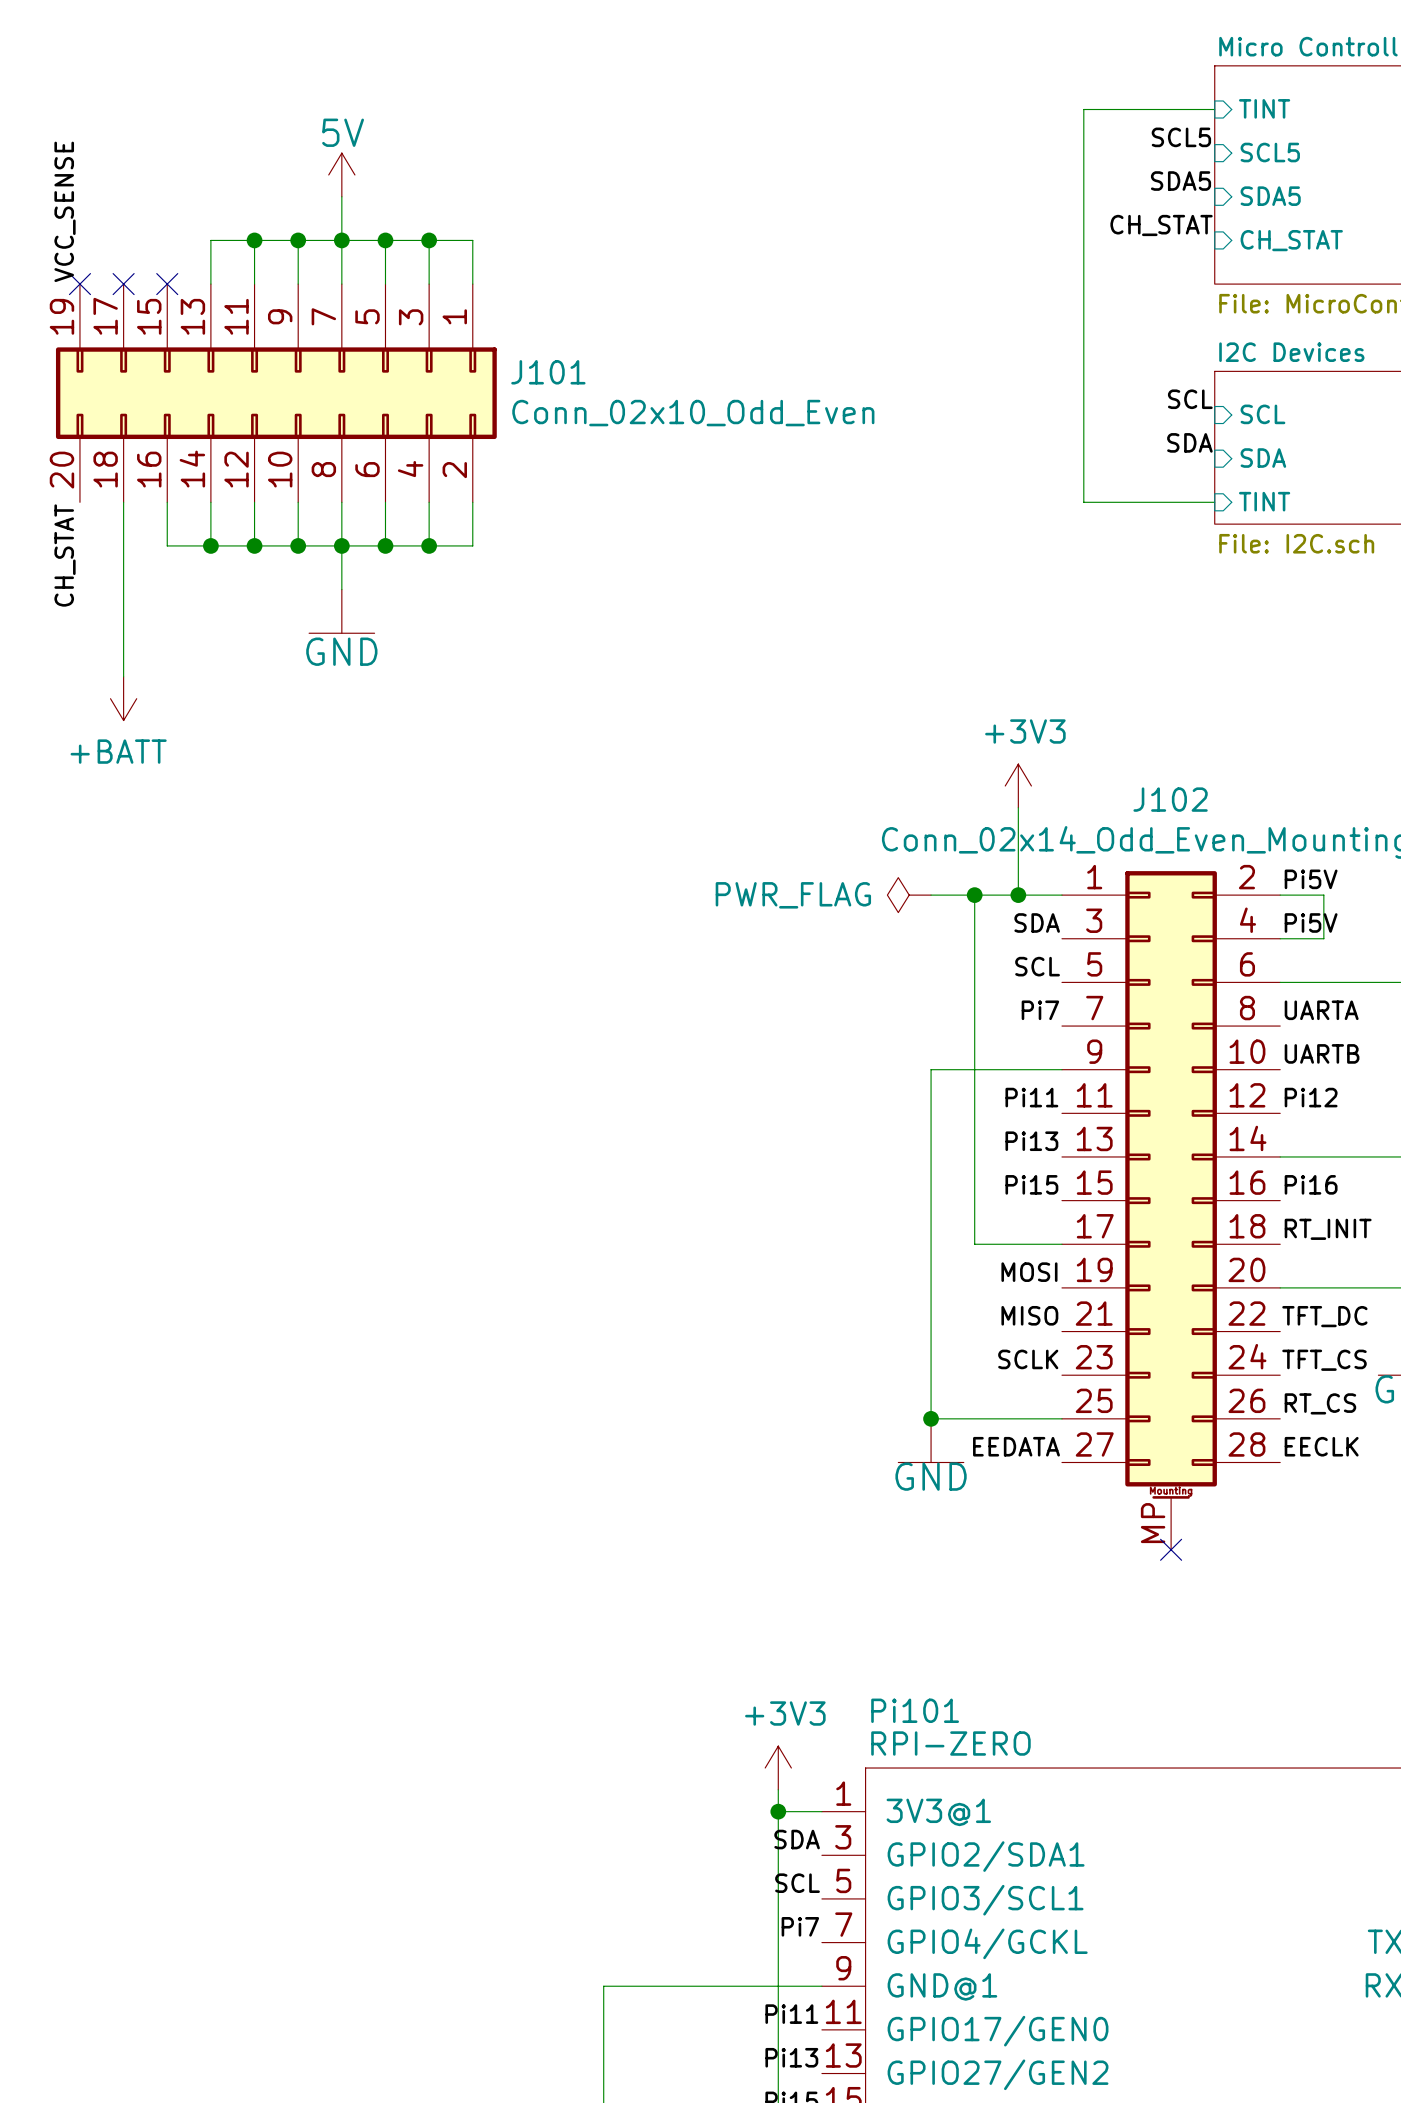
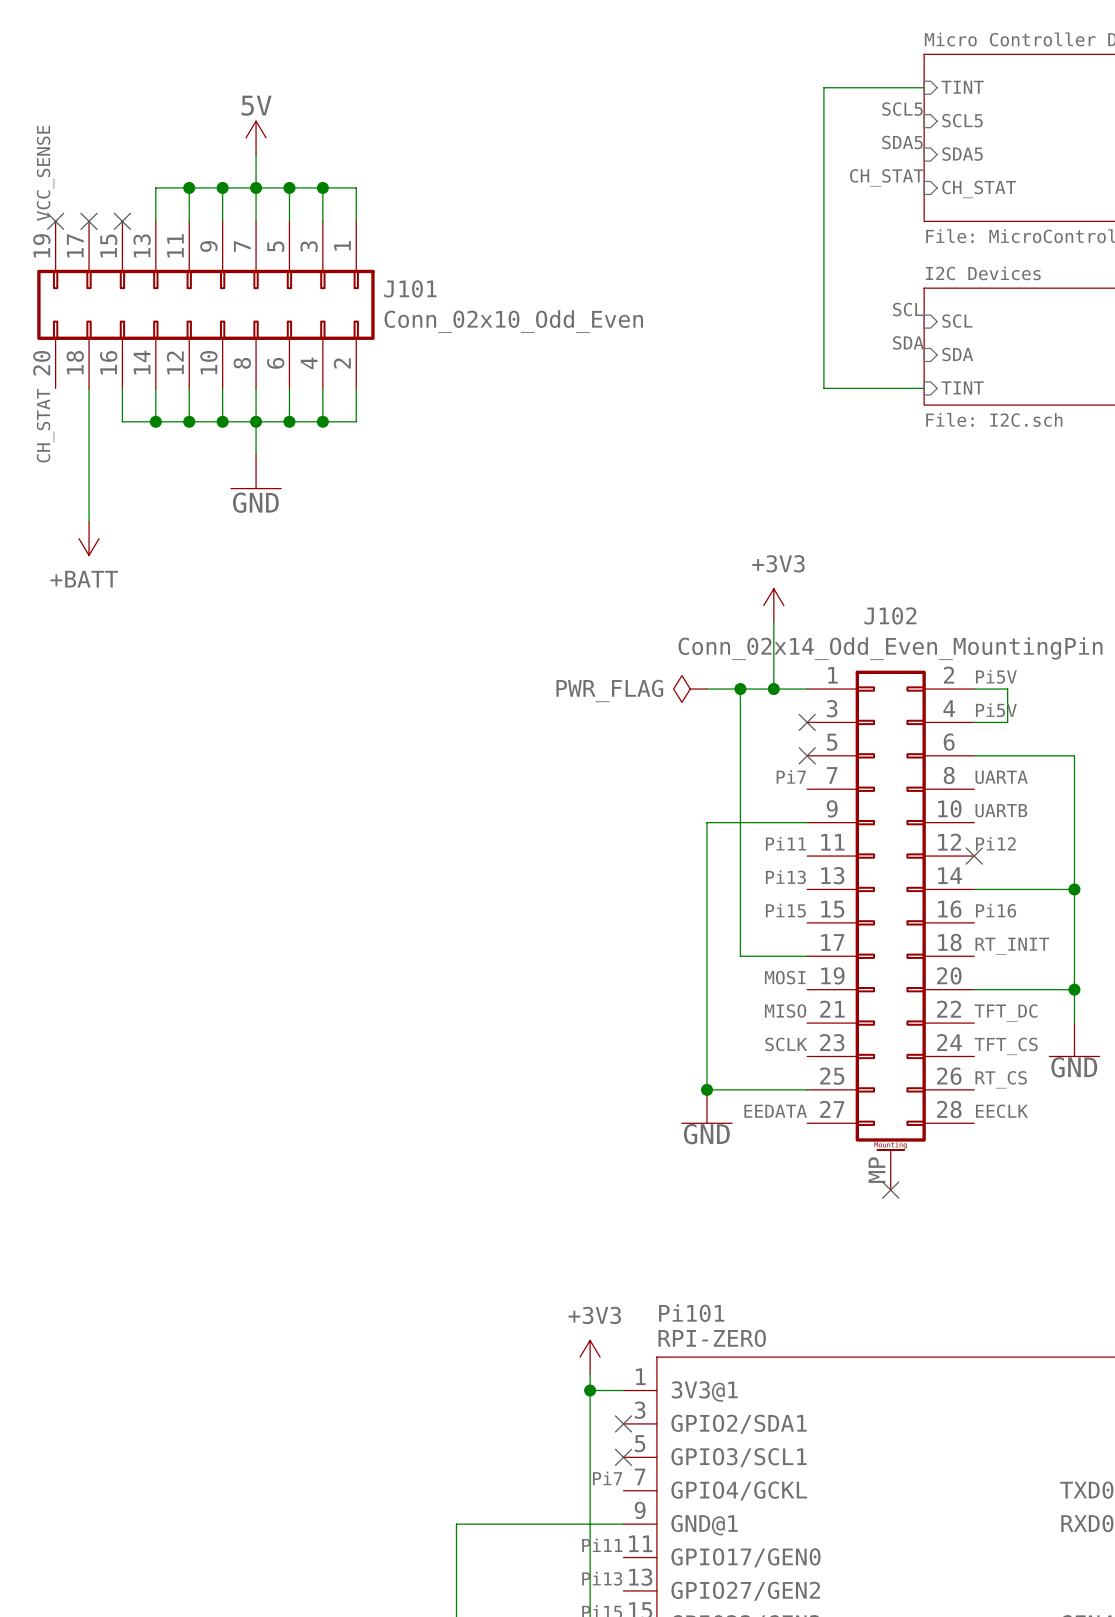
label: SDA (1037, 922) -> none
no-connect mark: none -> (807, 722)
label: SCL (1037, 966) -> none
no-connect mark: none -> (807, 755)
no-connect mark: none -> (974, 856)
label: SDA (797, 1839) -> none
no-connect mark: none -> (623, 1423)
label: SCL (797, 1883) -> none
no-connect mark: none -> (623, 1457)

